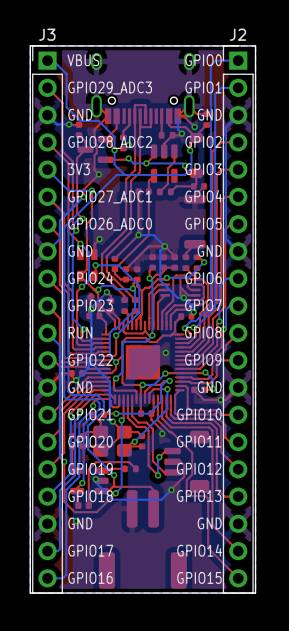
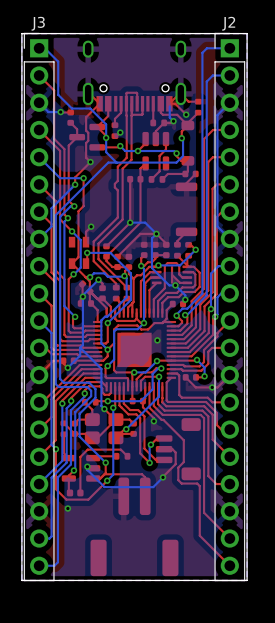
text: VBUS (83, 60) -> none
text: GPIO0 (203, 60) -> none
text: GPIO29_ADC3 (110, 87) -> none
text: GPIO1 (203, 87) -> none
text: GND (80, 114) -> none
text: GND (209, 114) -> none
text: GPIO2 (203, 141) -> none
text: GPIO28_ADC2 (110, 142) -> none
text: 3V3 (78, 169) -> none
text: GPIO3 (203, 169) -> none
text: GPIO27_ADC1 (110, 196) -> none
text: GPIO4 (203, 196) -> none
text: GPIO5 (203, 223) -> none
text: GPIO26_ADC0 (110, 224) -> none
text: GND (80, 250) -> none
text: GND (209, 250) -> none
text: GPIO24 (90, 277) -> none
text: GPIO6 (203, 278) -> none
text: GPIO23 (90, 305) -> none
text: GPIO7 (203, 305) -> none
text: RUN (80, 332) -> none
text: GPIO8 (203, 332) -> none
text: GPIO22 (90, 359) -> none
text: GPIO9 (203, 359) -> none
text: GND (80, 387) -> none
text: GND (209, 387) -> none
text: GPIO21 (90, 414) -> none
text: GPIO10 (199, 414) -> none
text: GPIO20 (90, 441) -> none
text: GPIO11 (199, 441) -> none
text: GPIO19 (90, 468) -> none
text: GPIO12 (199, 468) -> none
text: GPIO13 (199, 495) -> none
text: GPIO18 (90, 496) -> none
text: GND (80, 523) -> none
text: GND (209, 523) -> none
text: GPIO17 (90, 550) -> none
text: GPIO14 (199, 550) -> none
text: GPIO16 (90, 577) -> none
text: GPIO15 (199, 577) -> none

